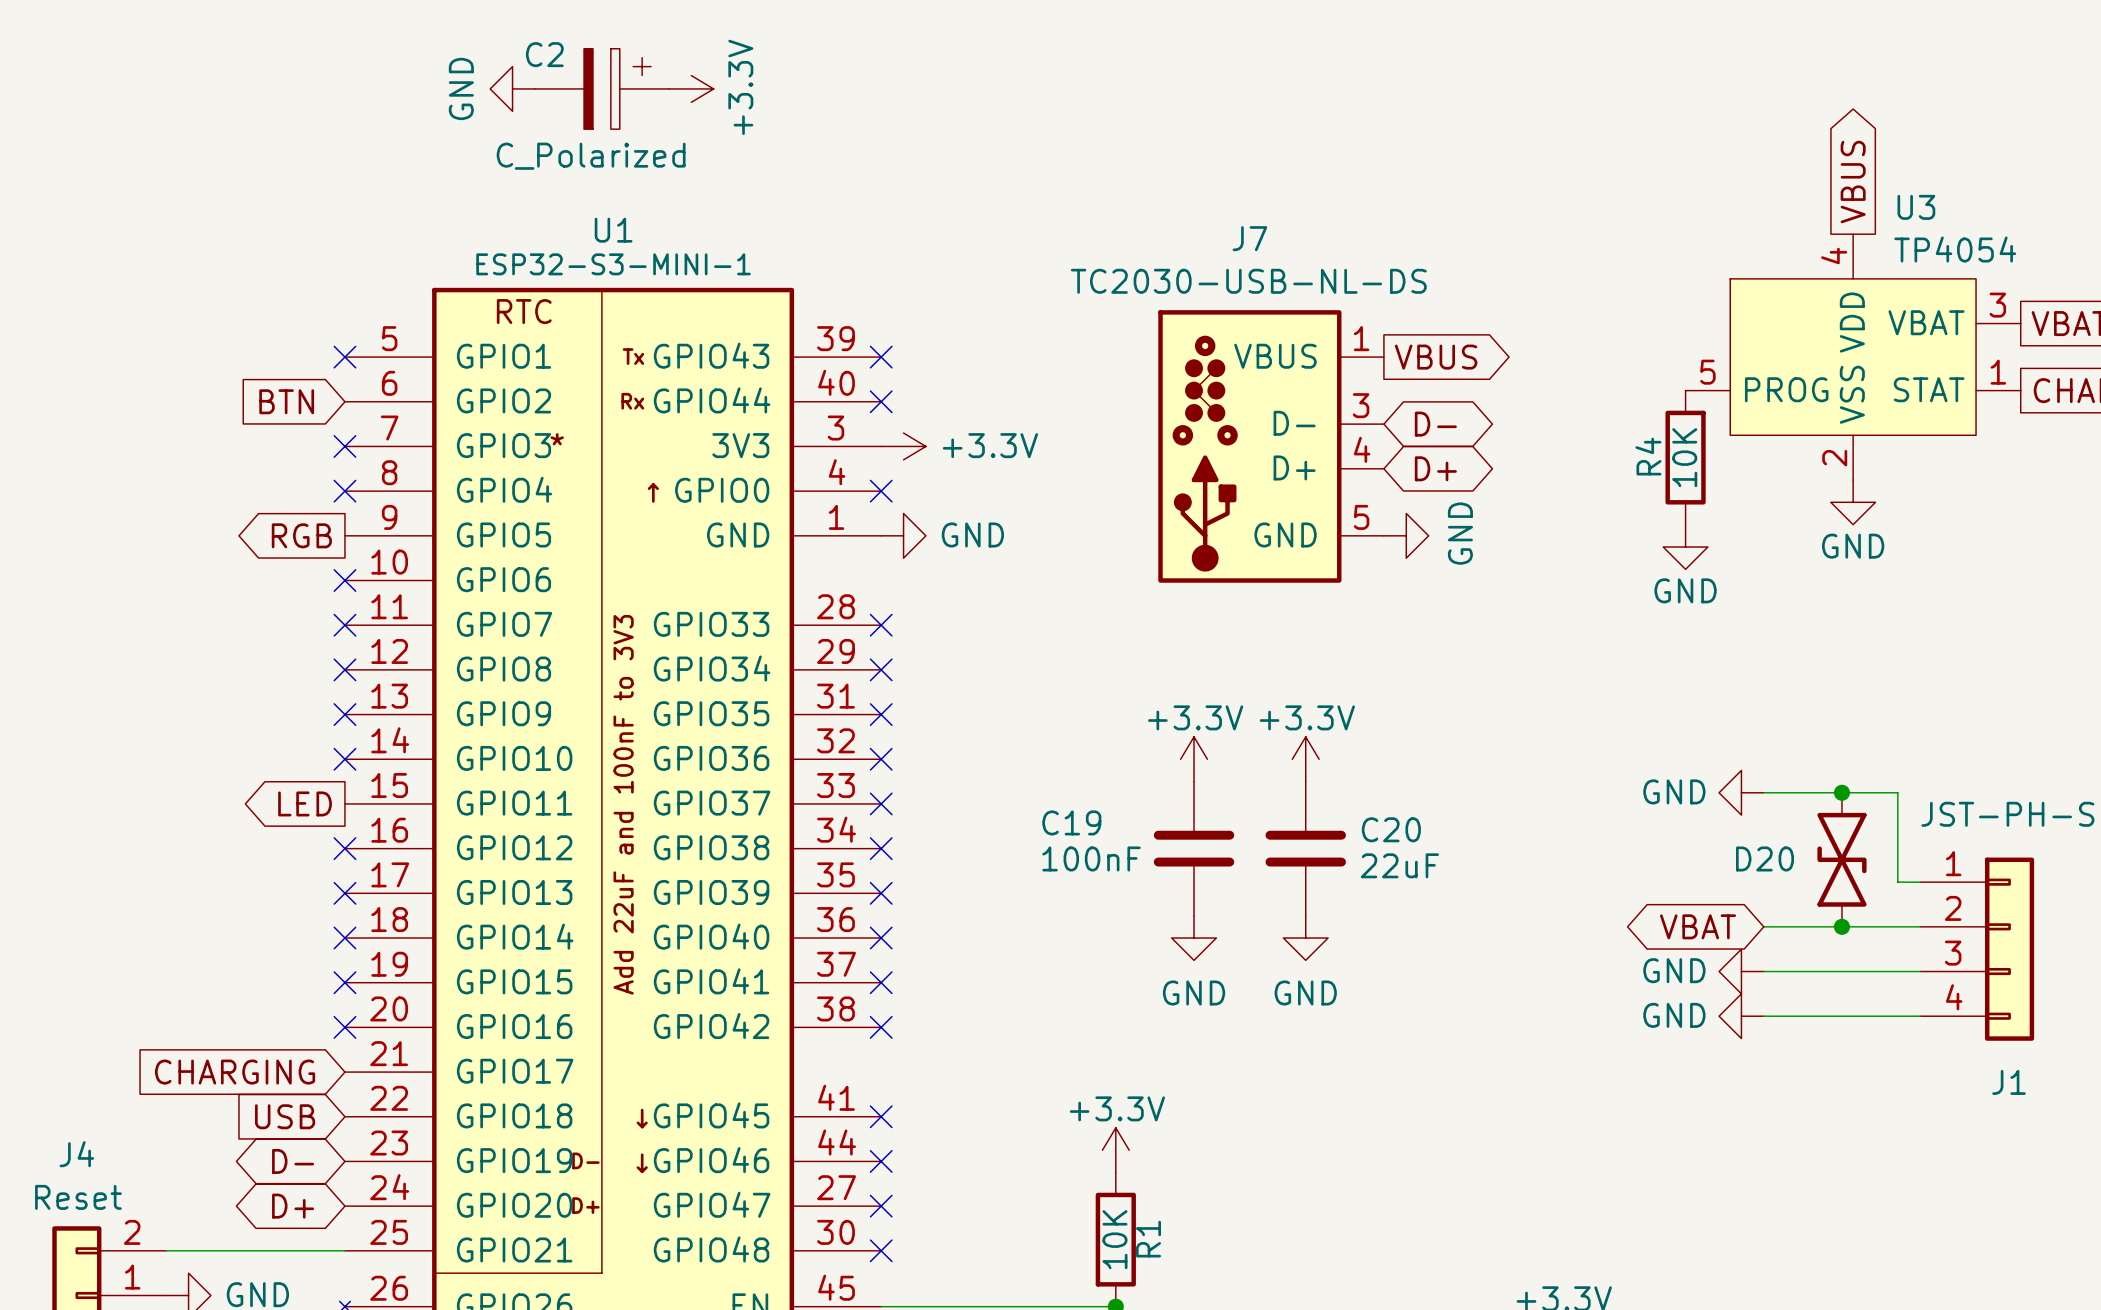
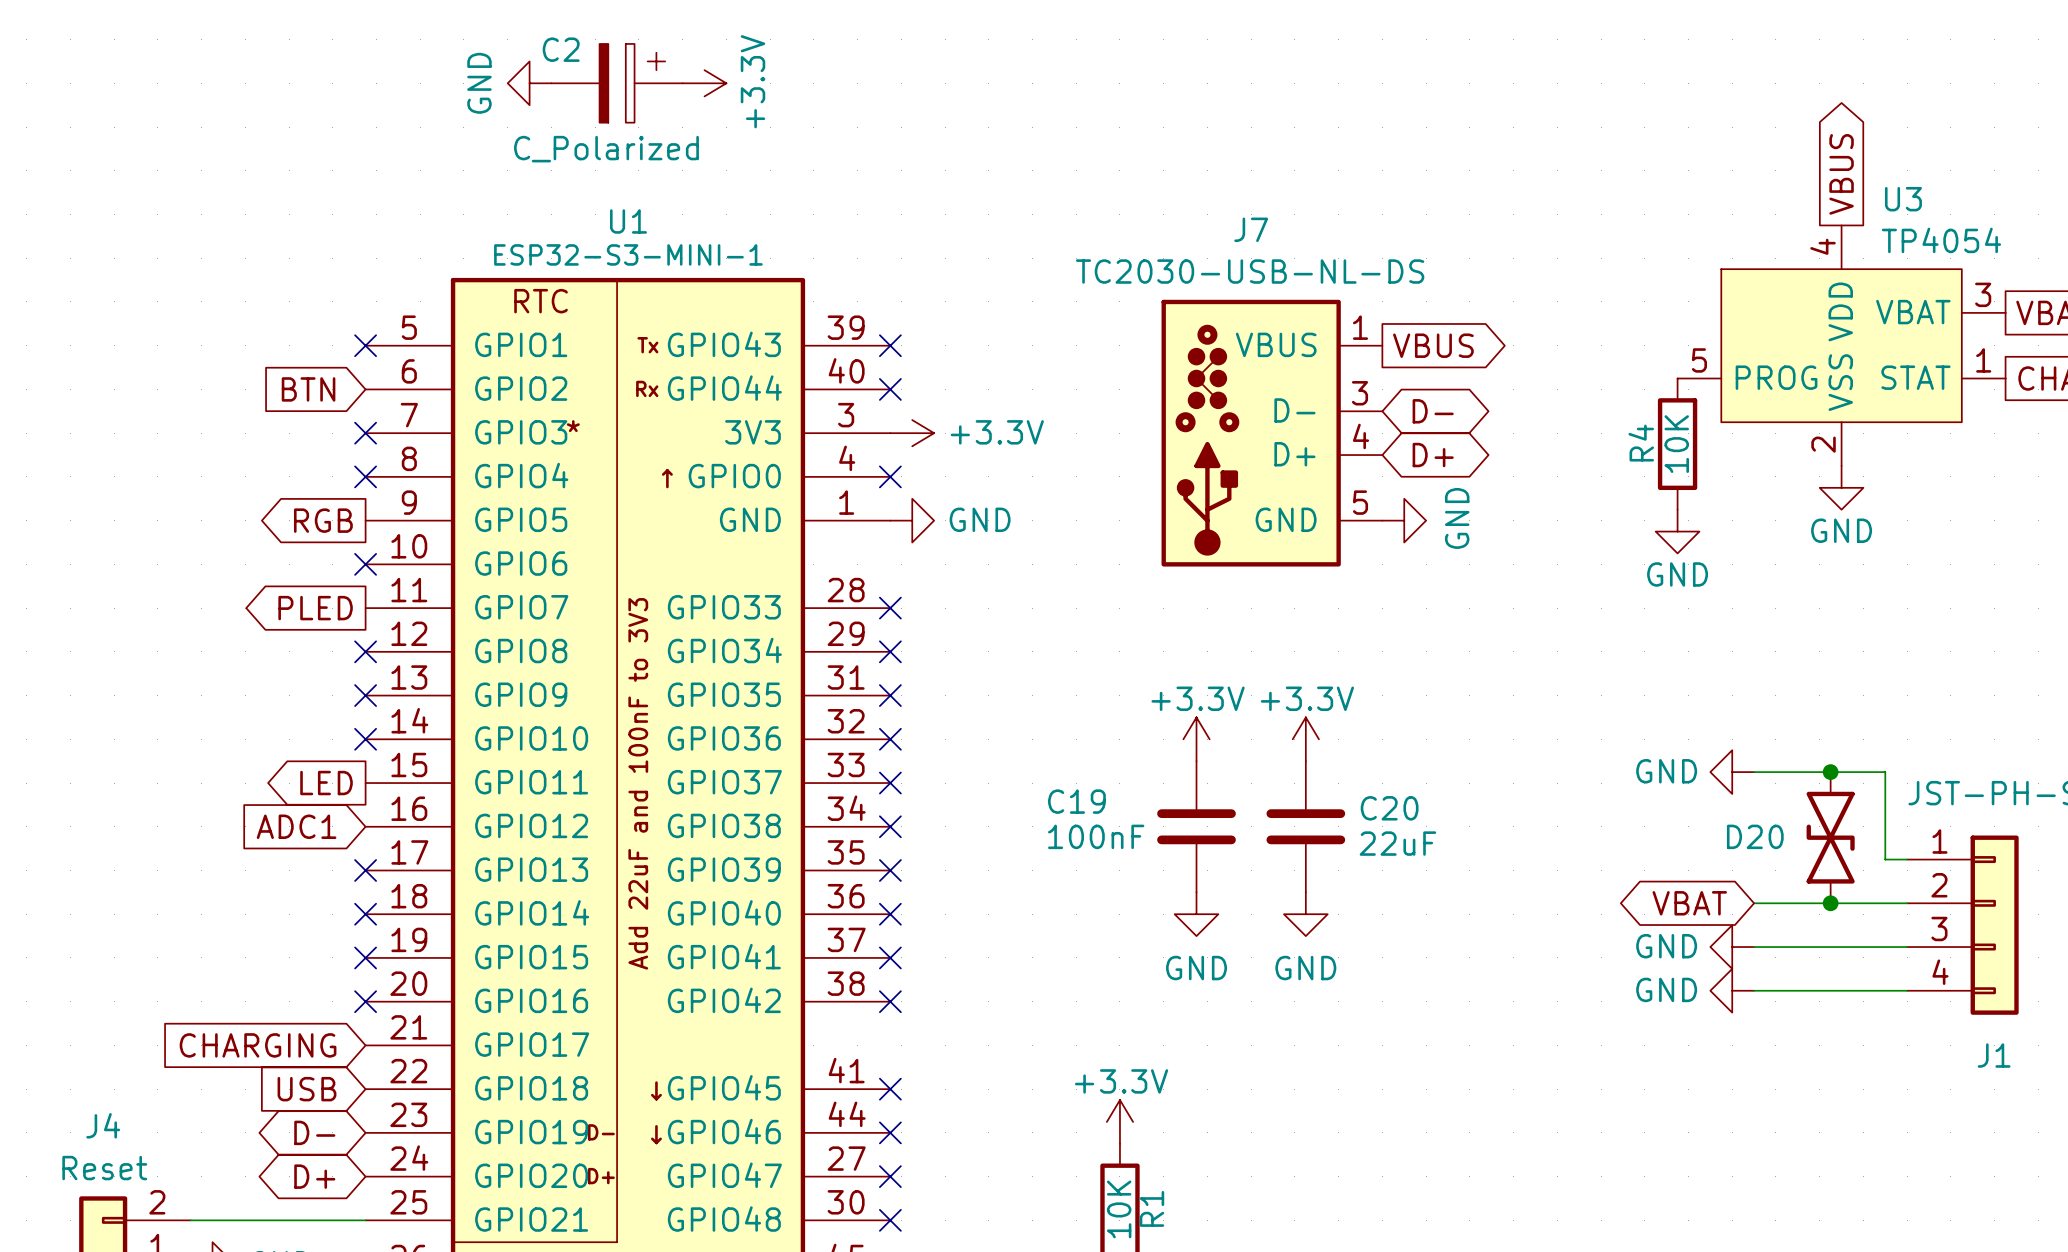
global label: none -> PLED (315, 608)
no-connect mark: (344, 625) -> none
global label: none -> ADC1 (296, 826)
no-connect mark: (344, 848) -> none

